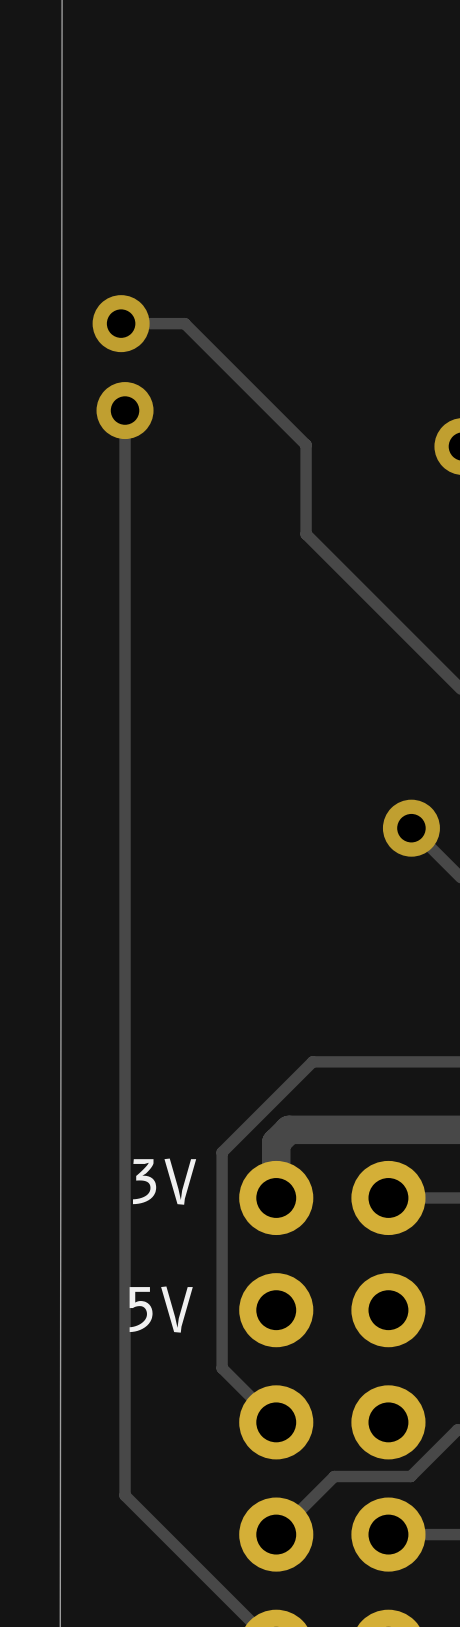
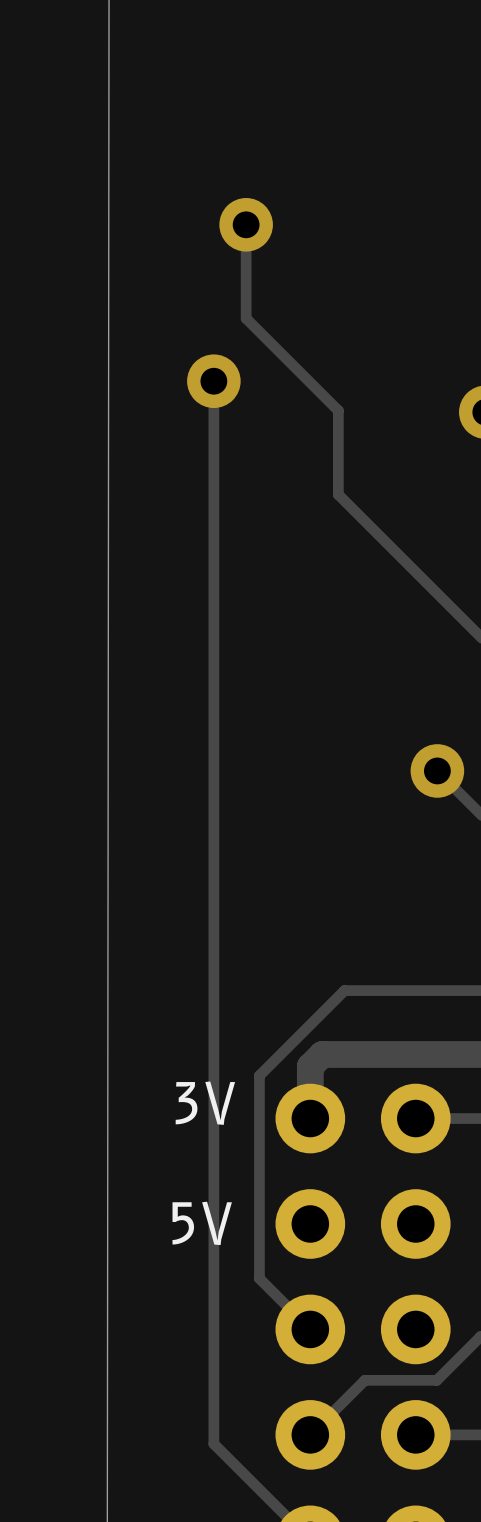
via: none -> (246, 224)
track: (121, 323) (184, 323) (207, 346) -> (246, 224) (246, 318)
via: (121, 323) -> none
track: (125, 410) (125, 1495) (173, 1544) -> (213, 381) (213, 1443)
via position: (125, 410) -> (213, 381)

